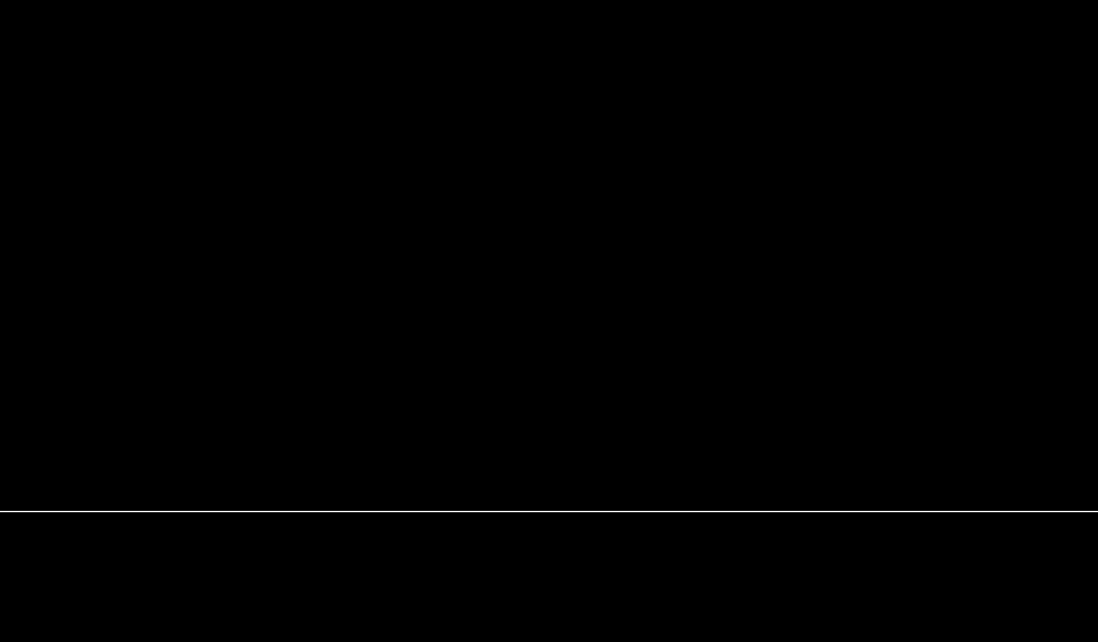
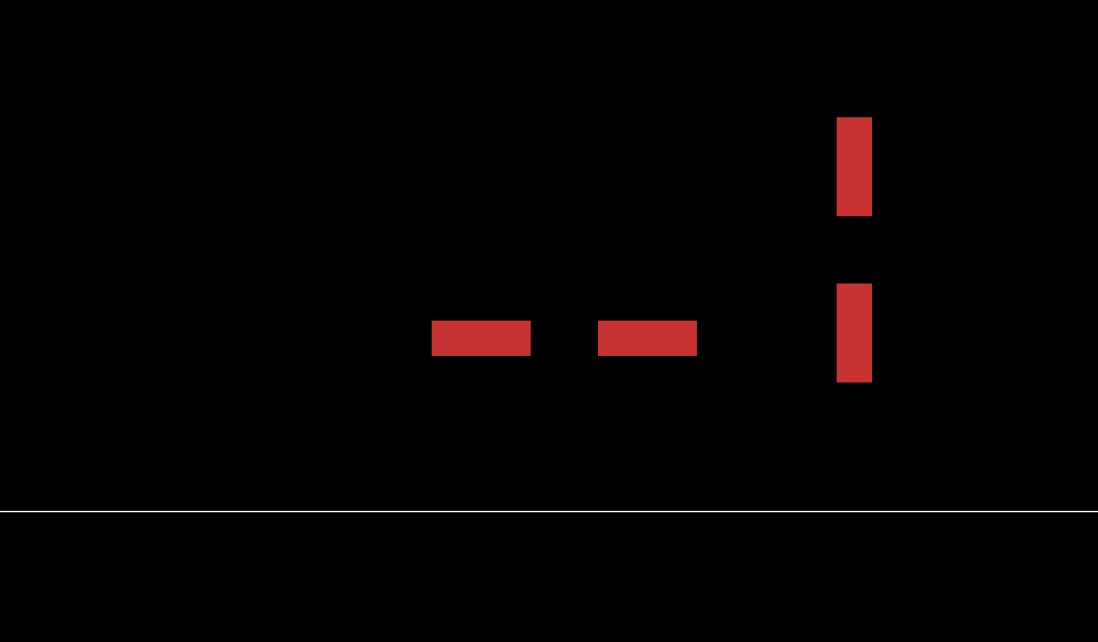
part: none -> (854, 249)
part: none -> (564, 338)

